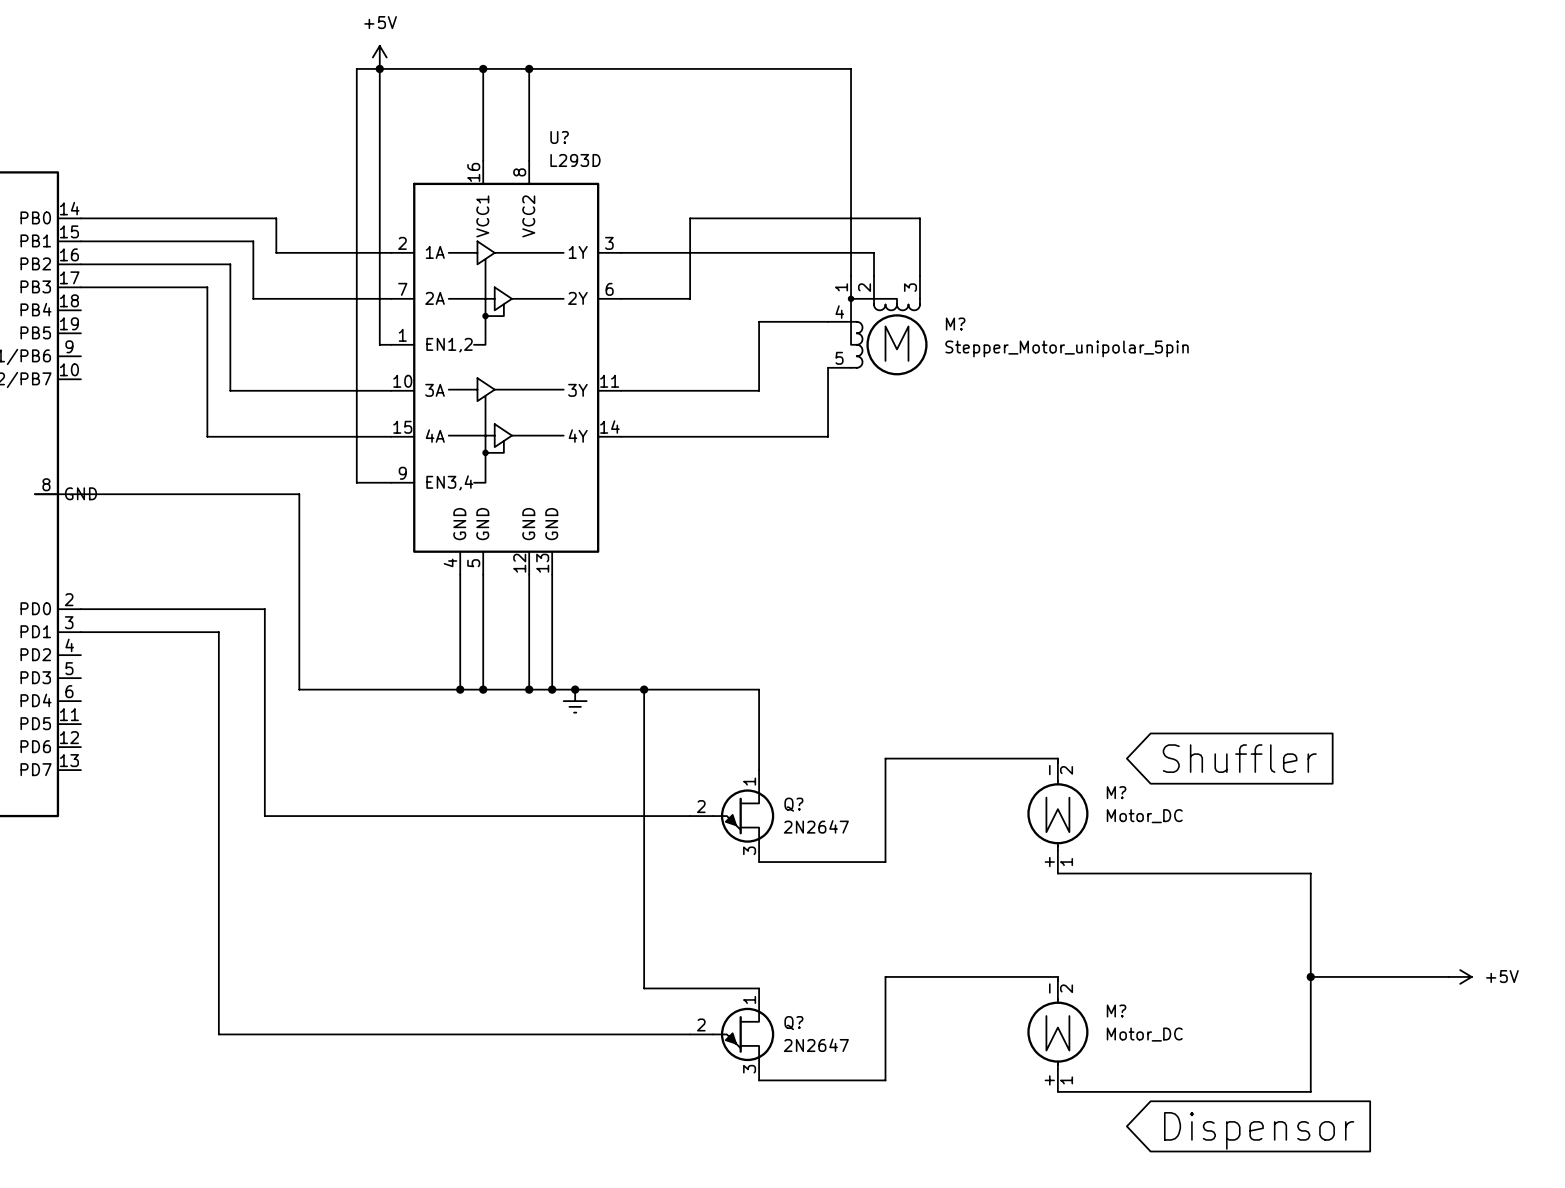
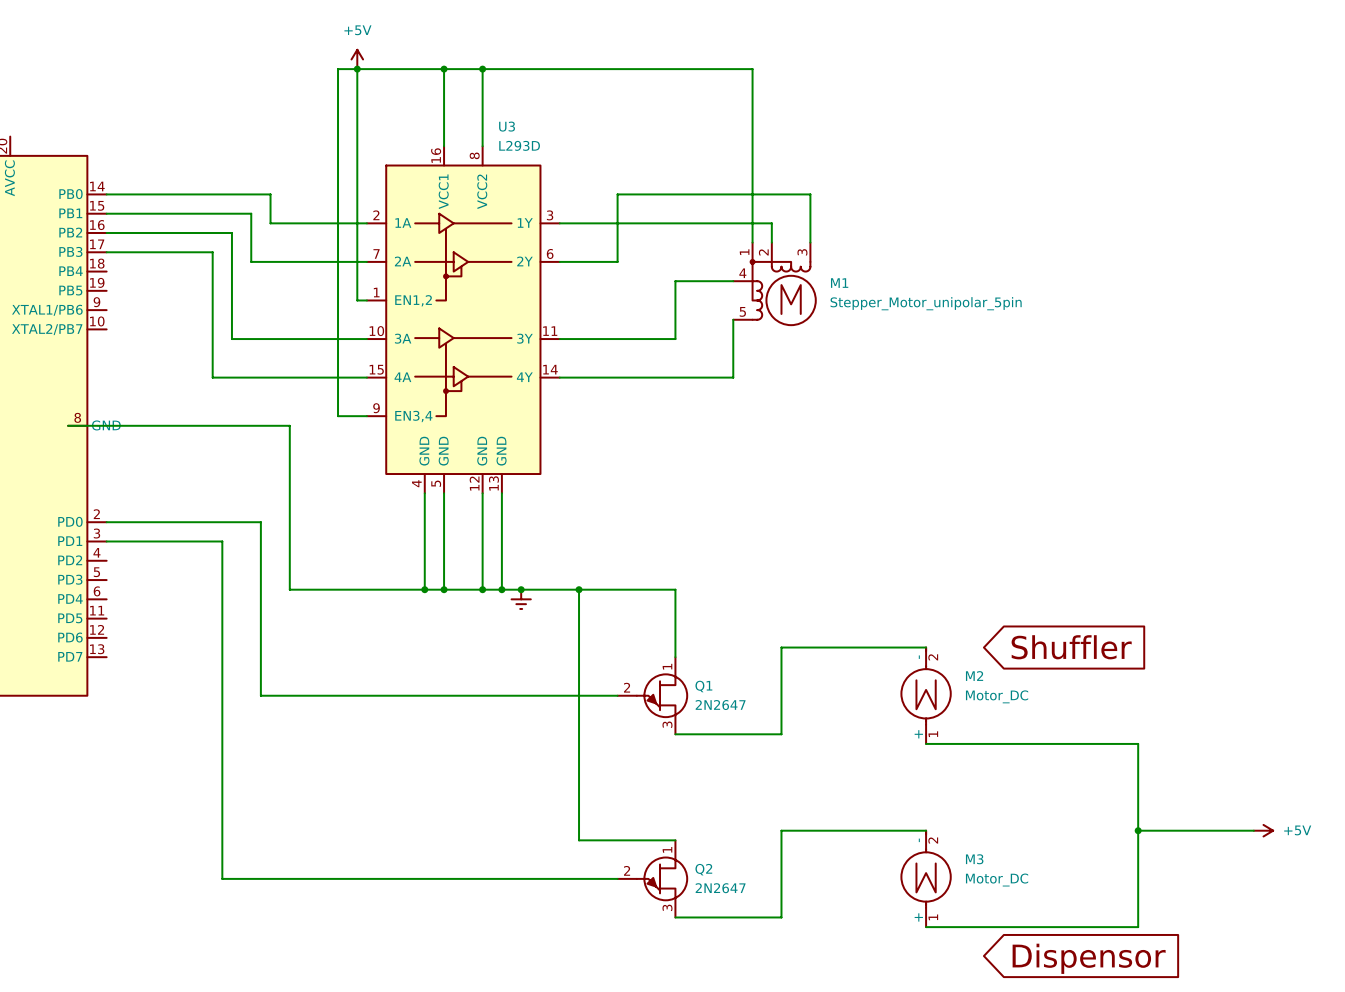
U? name: U? (559, 137) -> U3 (507, 126)
M? name: M? (955, 324) -> M1 (839, 283)
M? name: M? (1116, 792) -> M2 (974, 676)
Q? name: Q? (793, 804) -> Q1 (703, 686)
M? name: M? (1116, 1011) -> M3 (974, 859)
Q? name: Q? (793, 1023) -> Q2 (703, 869)

